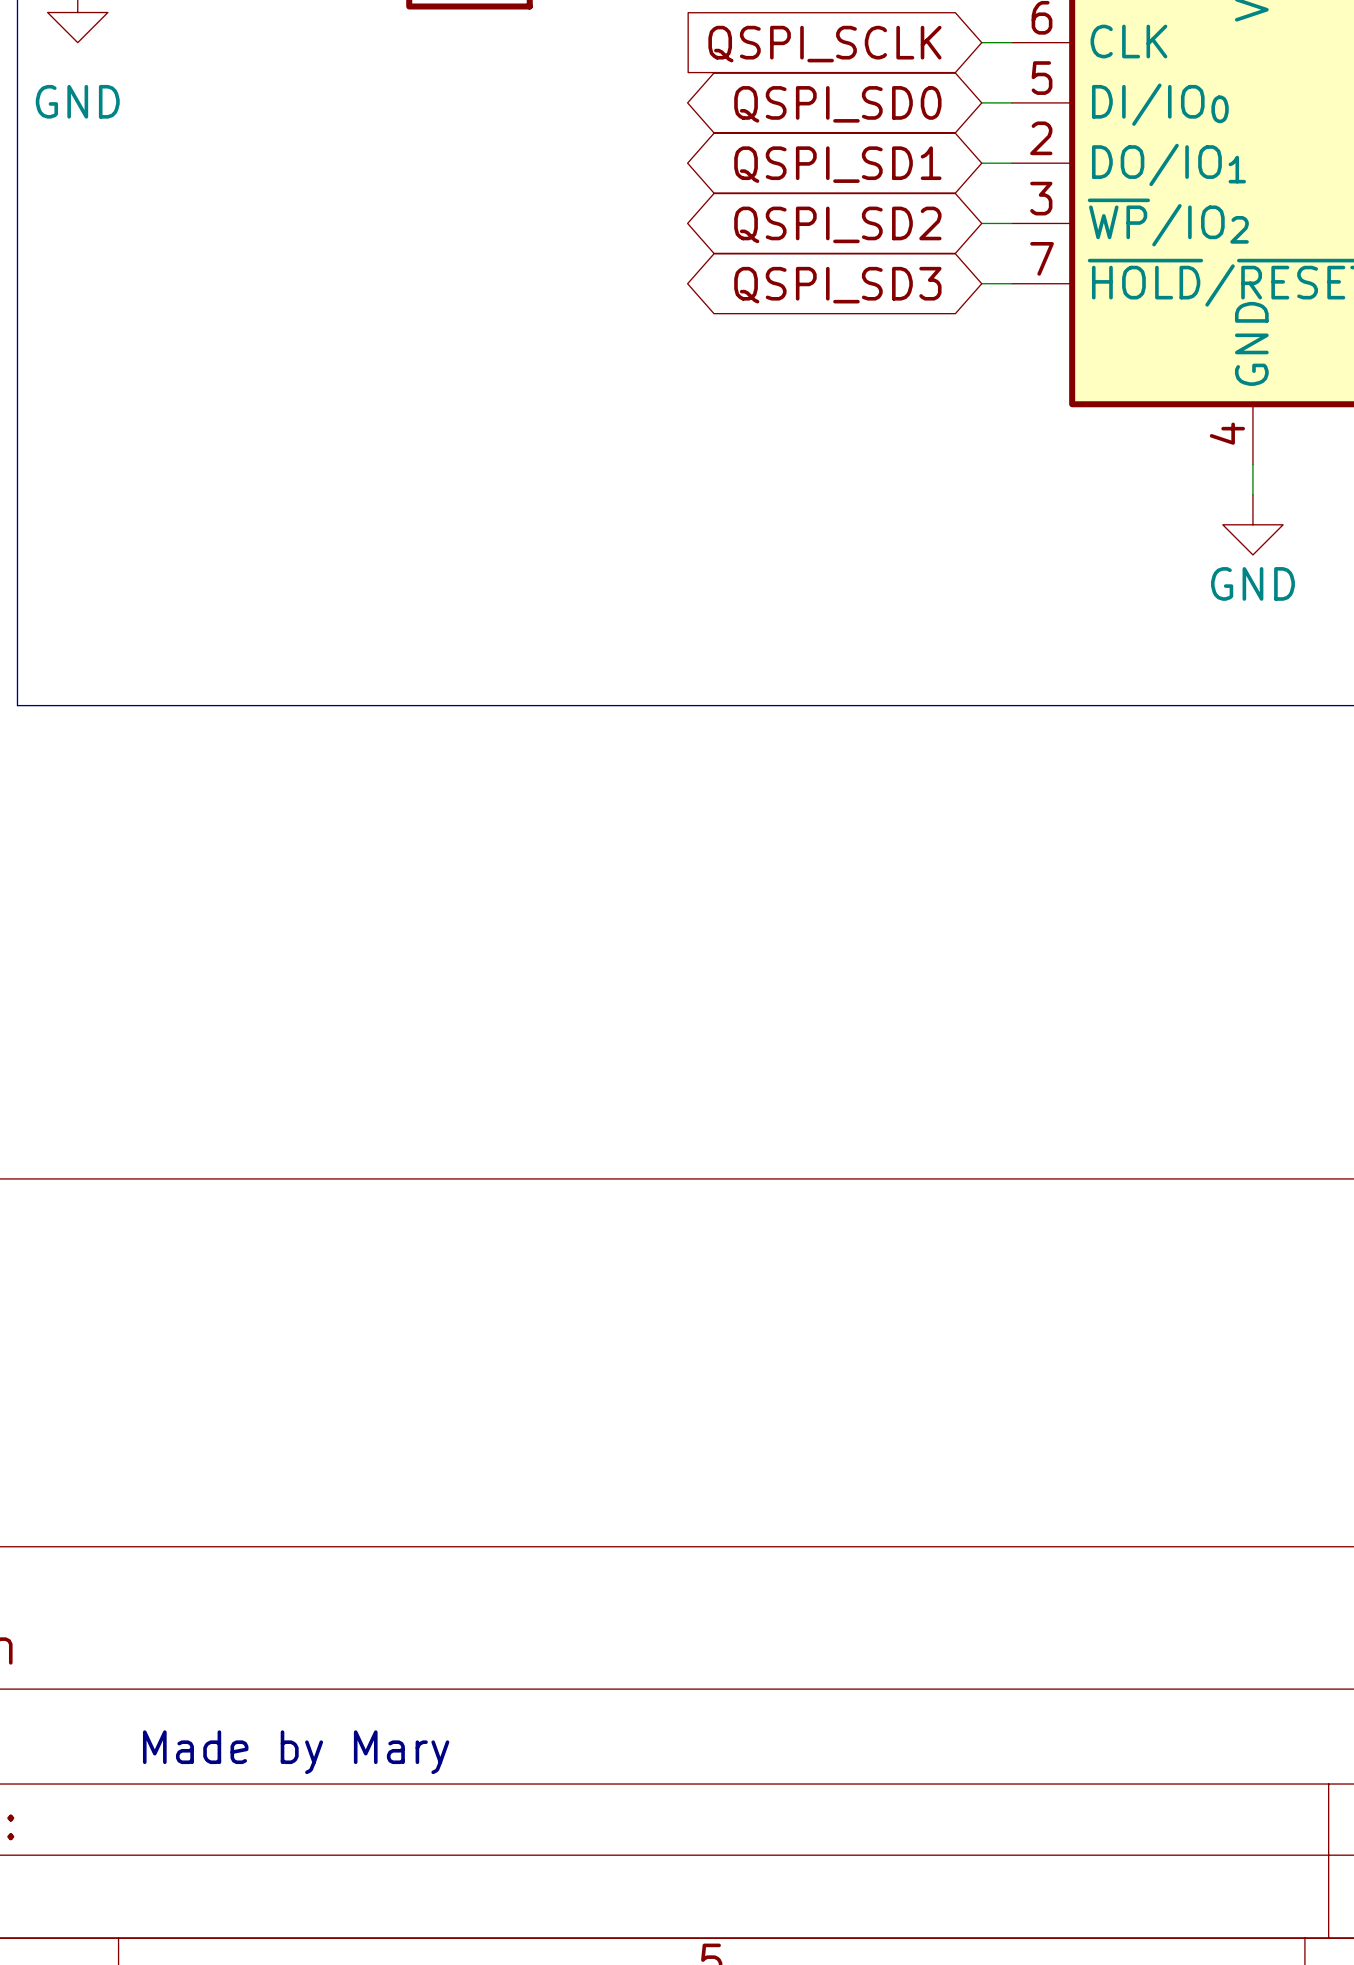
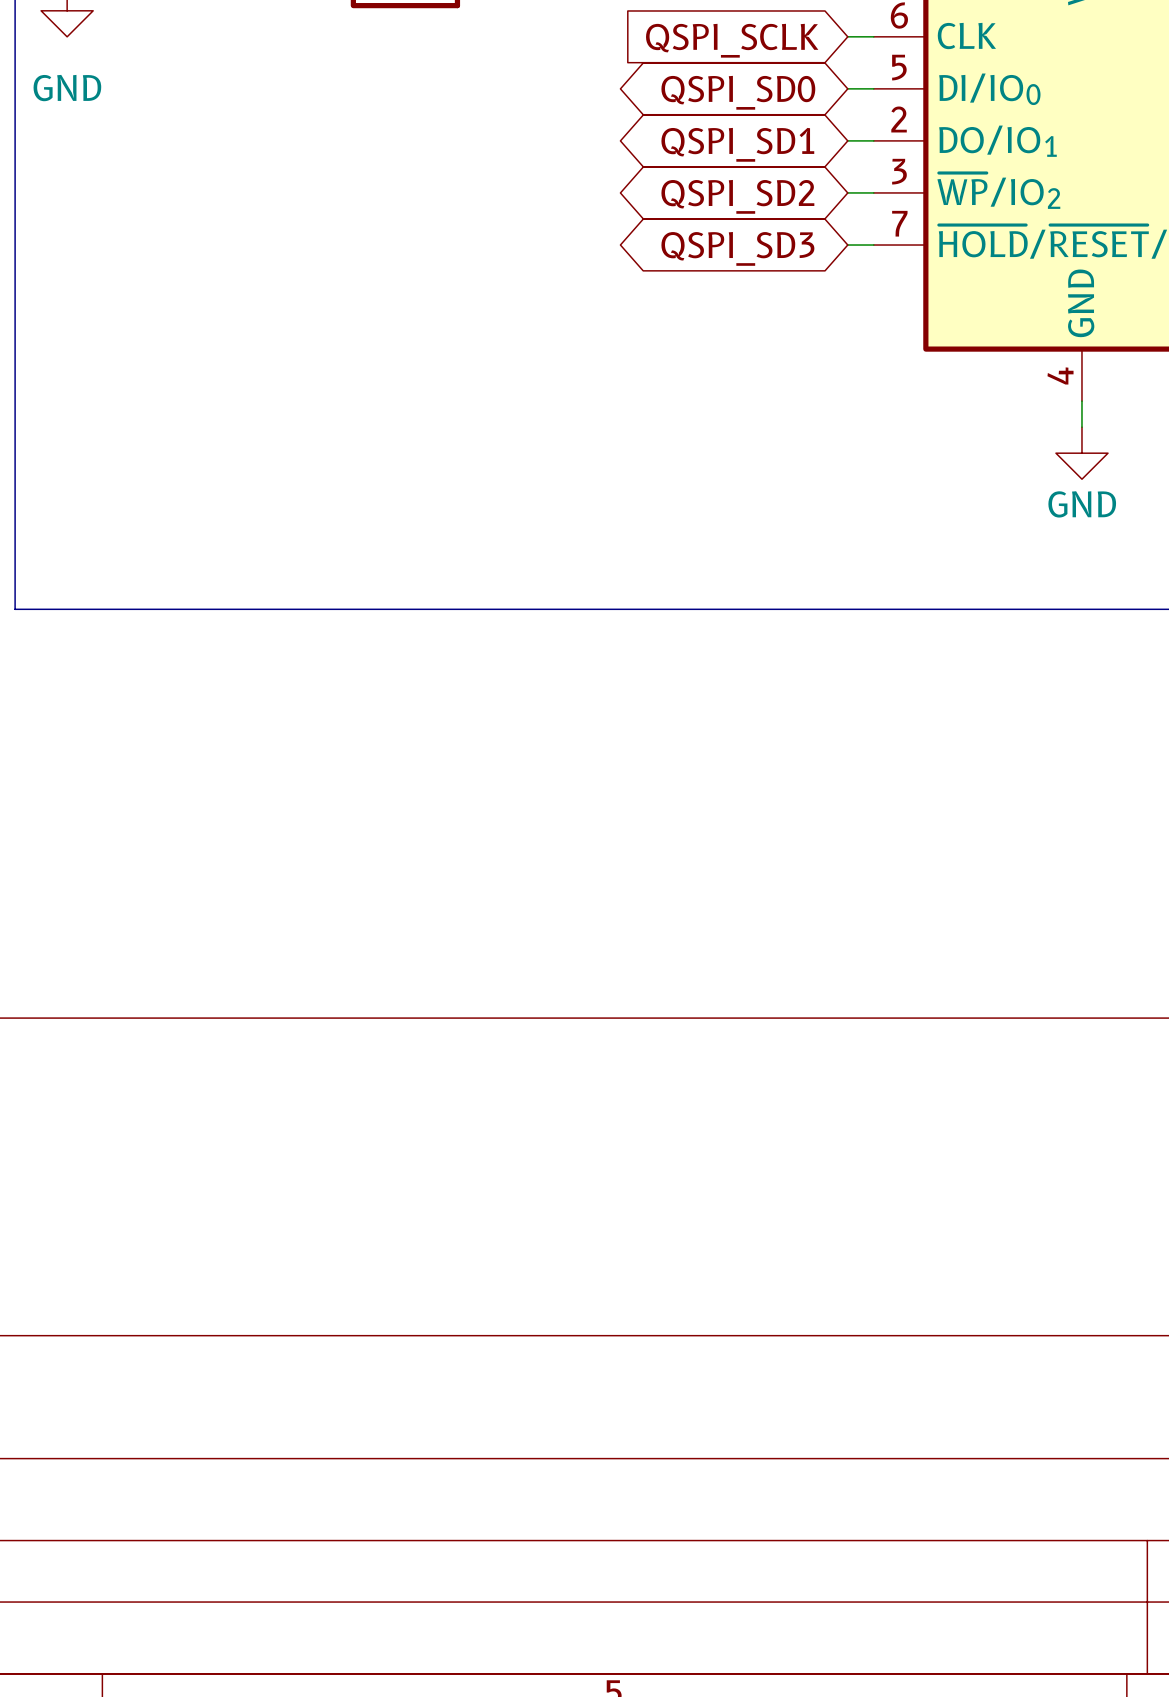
text: Made by Mary (296, 1752) -> none

